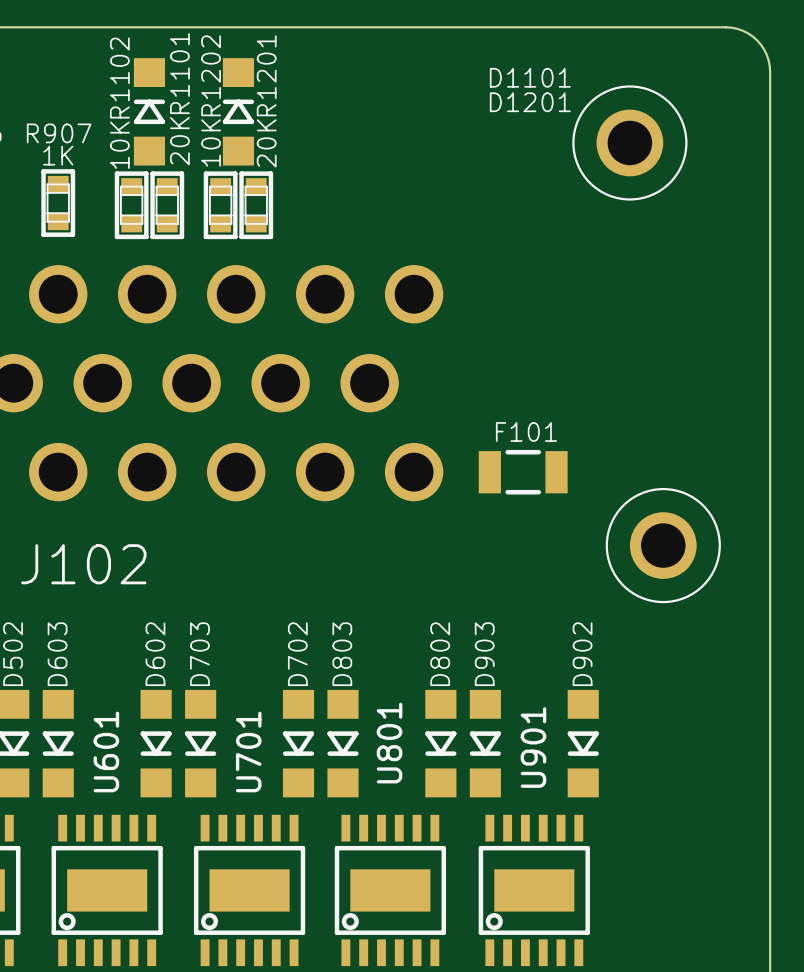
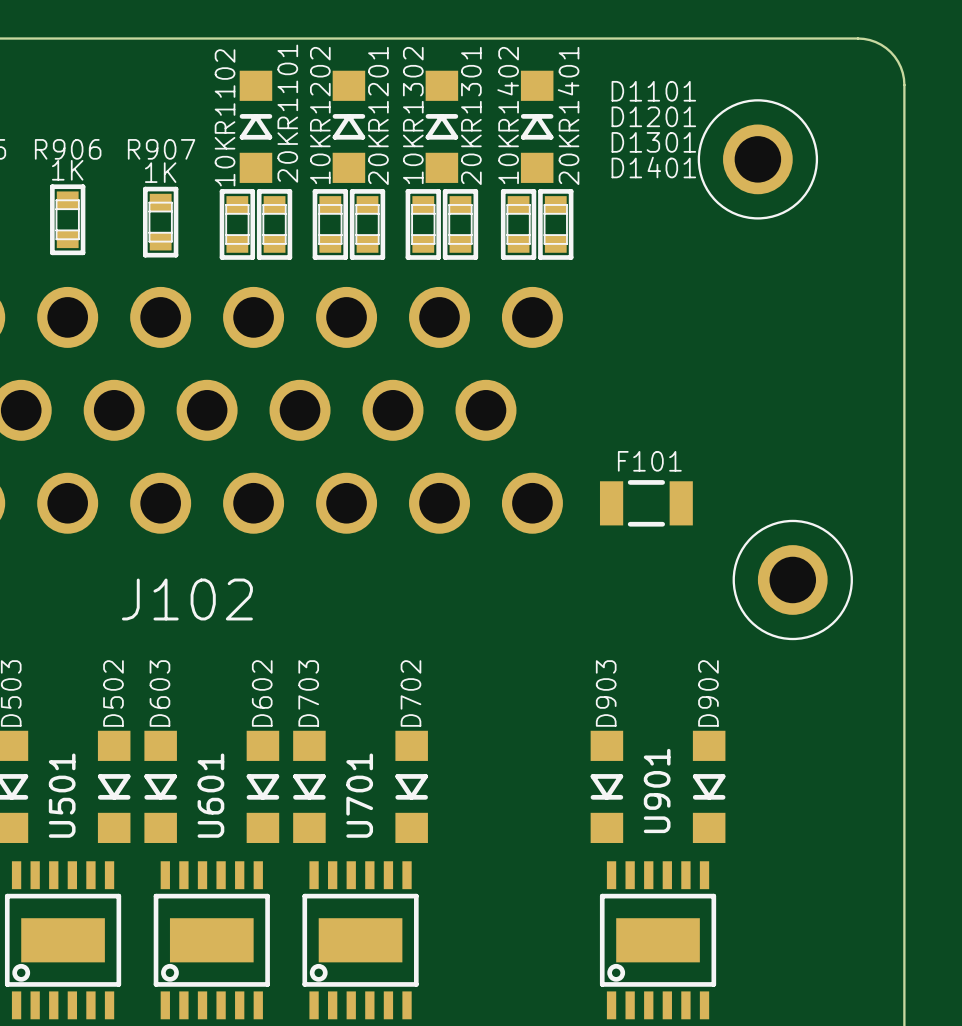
D1301: none -> (441, 126)
D1401: none -> (537, 126)
R1301: none -> 10K (423, 224)
R1302: none -> 20K (460, 224)
R1401: none -> 10K (518, 224)
R1402: none -> 20K (555, 224)
D803: (343, 743) -> none
D802: (440, 743) -> none
U801: (390, 890) -> none

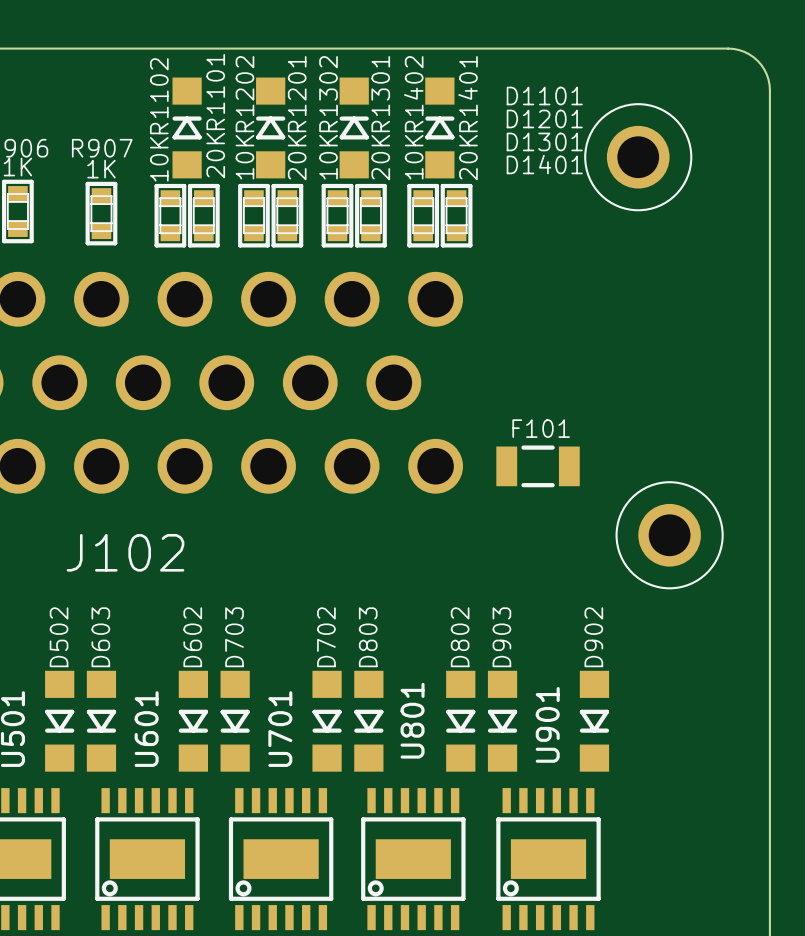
D803: none -> (368, 721)
D802: none -> (460, 721)
U801: none -> (413, 859)

